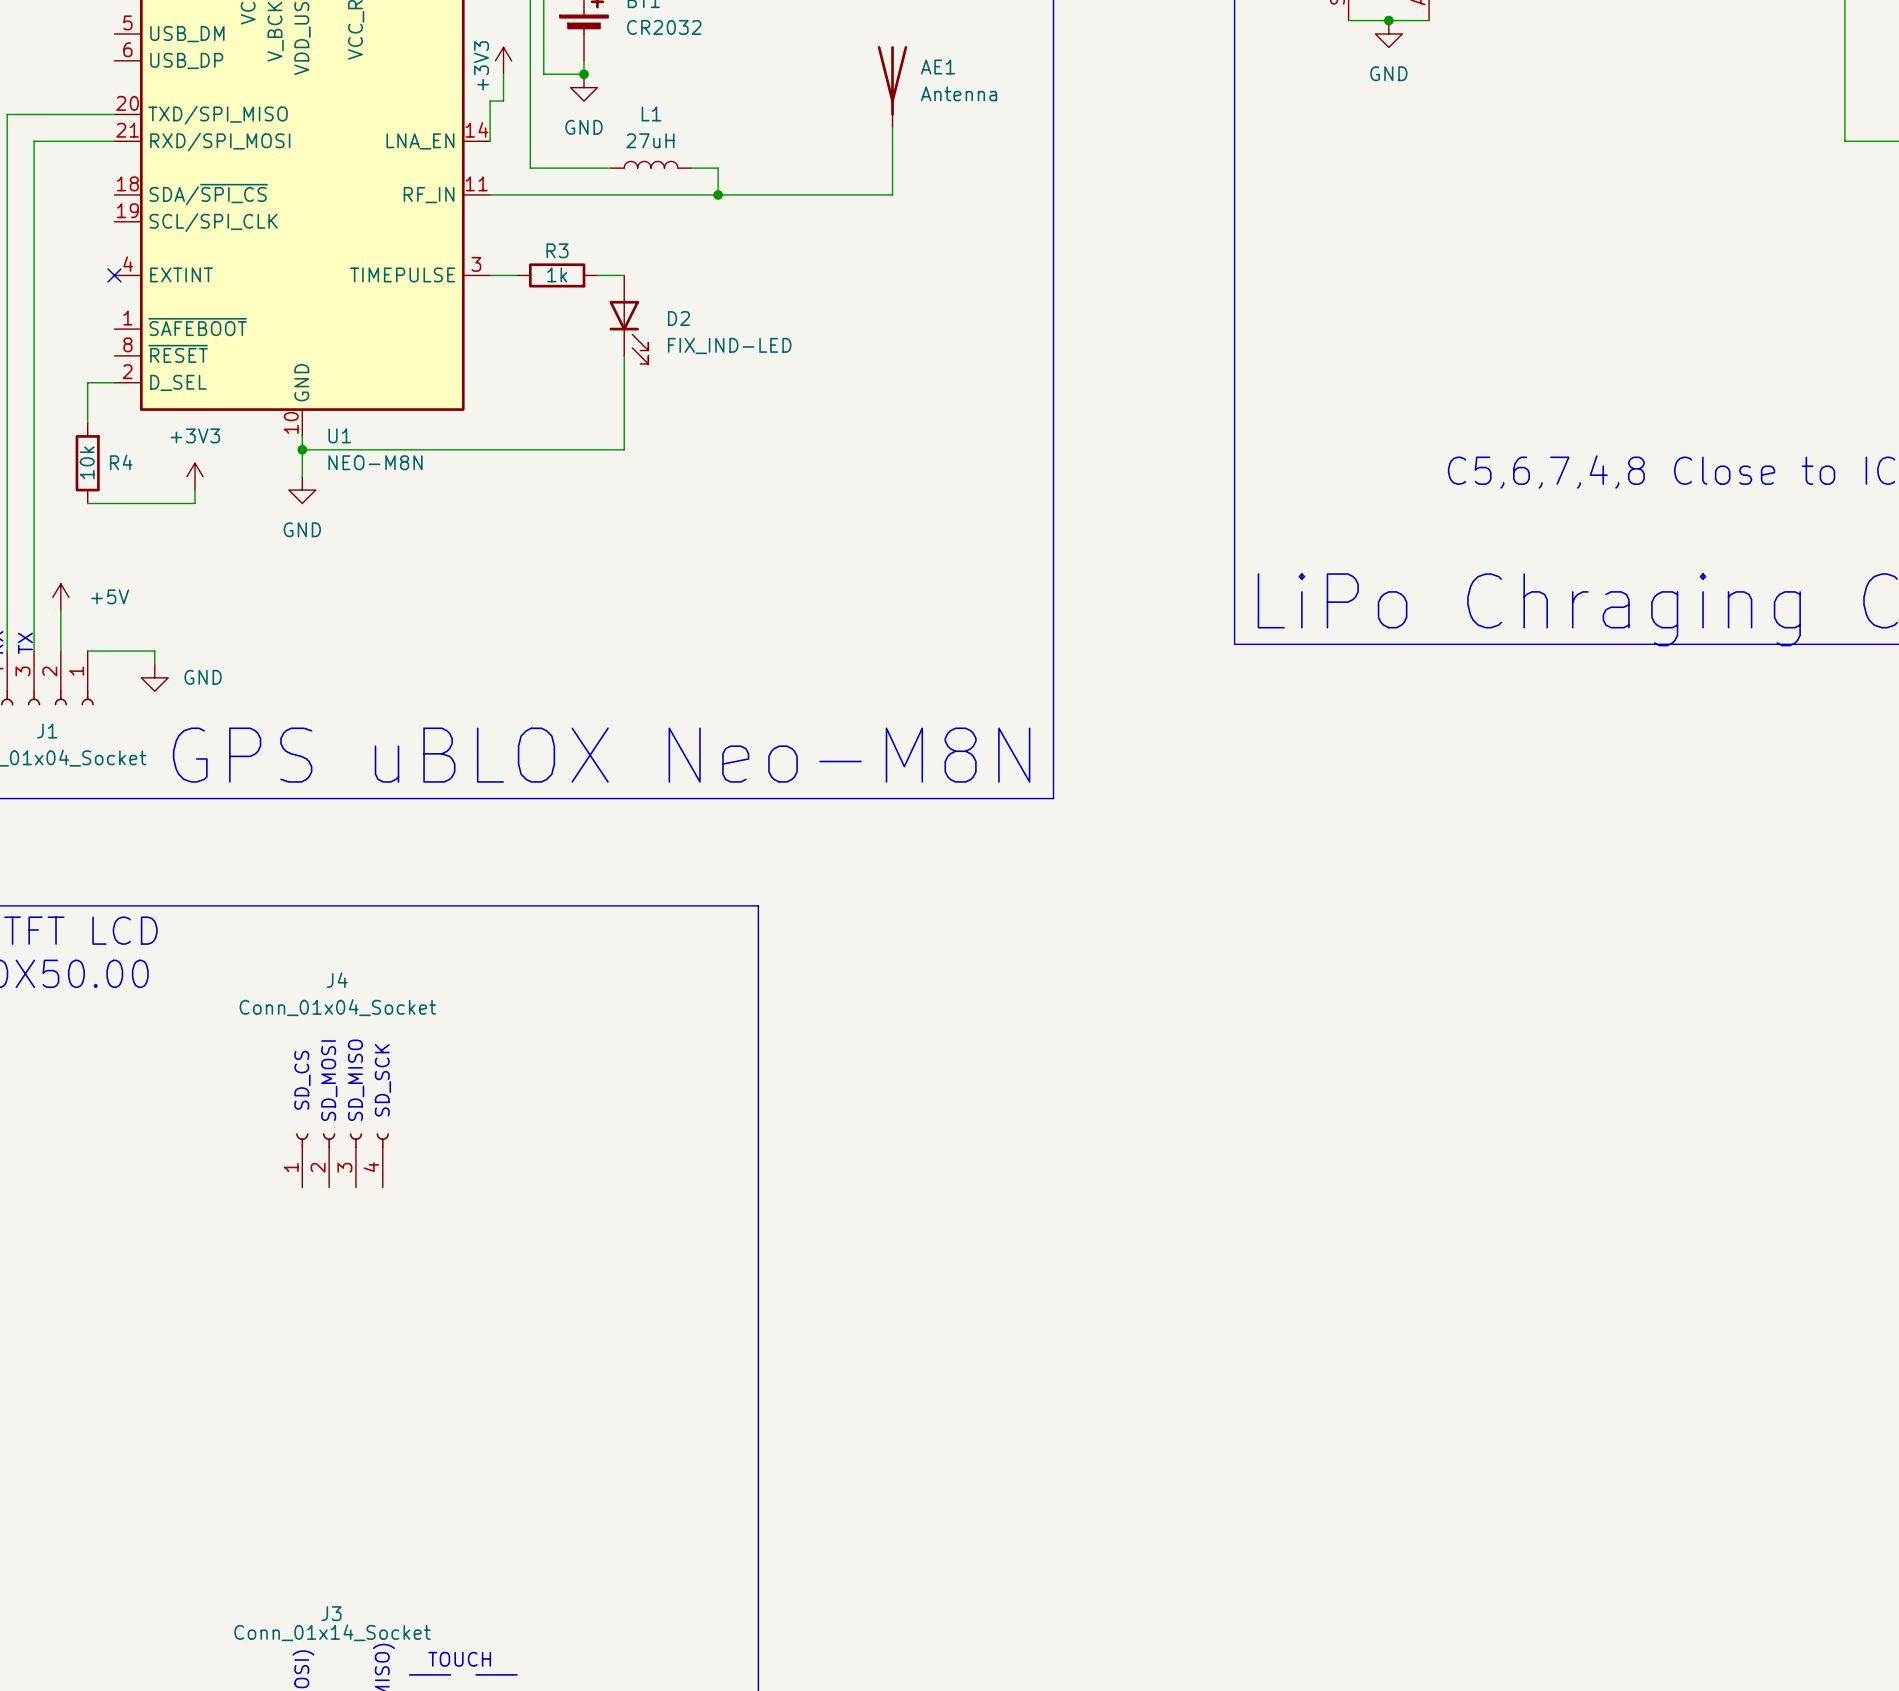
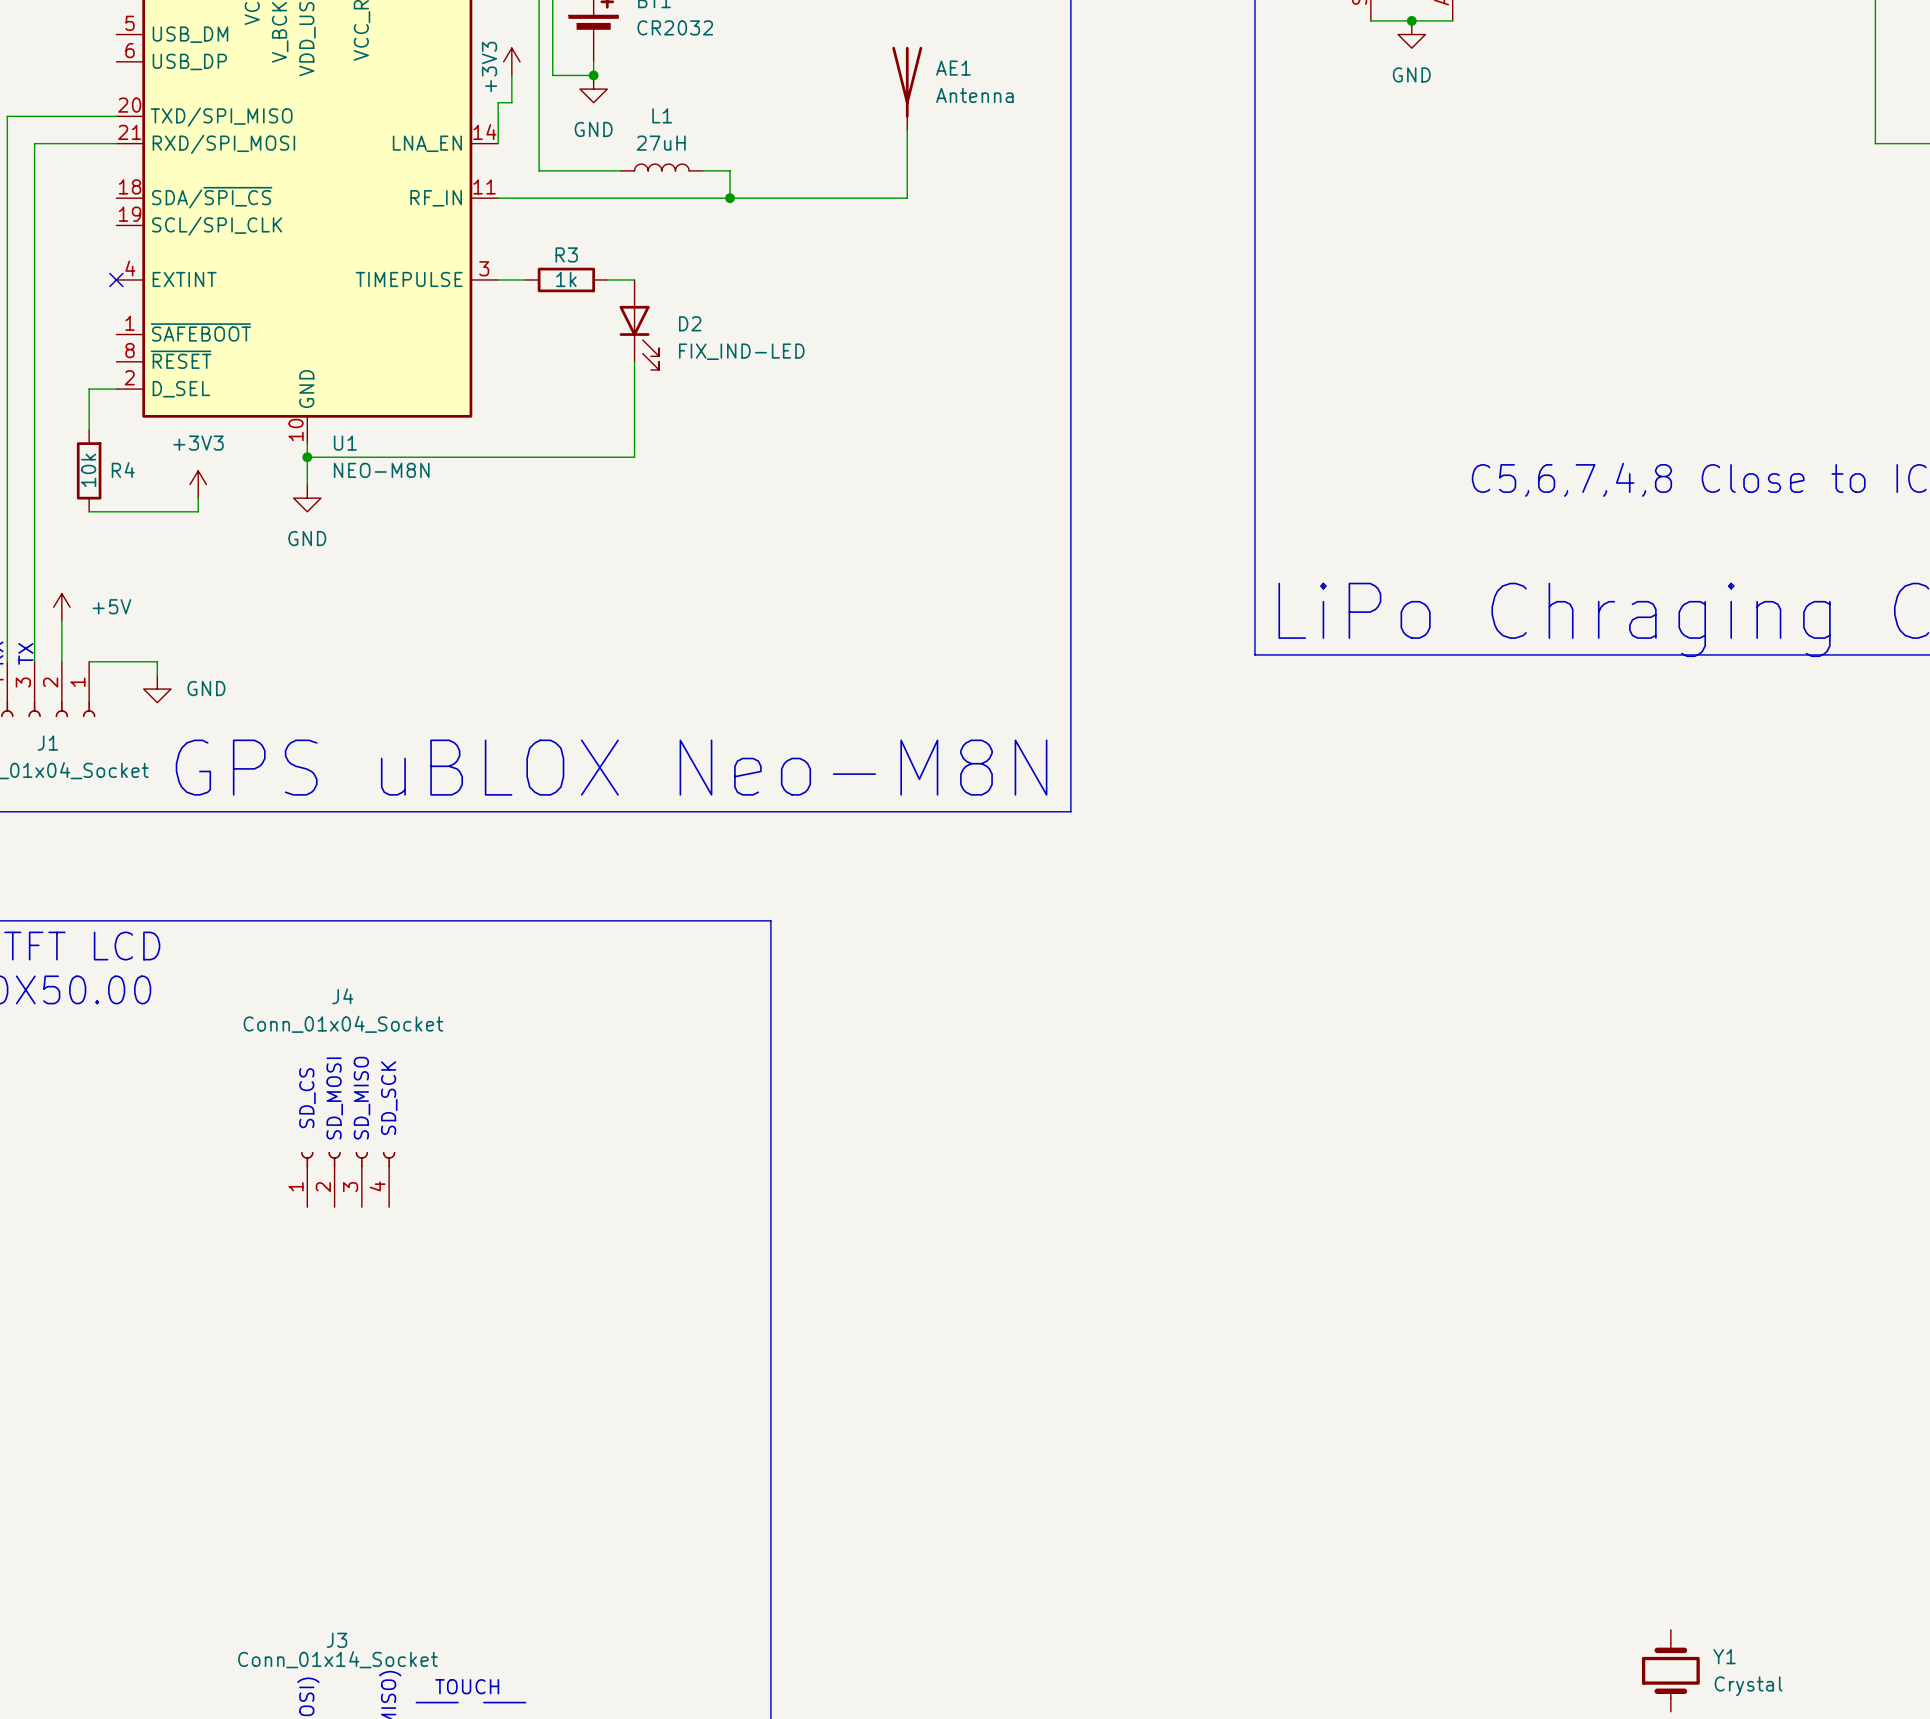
Y1: none -> Crystal (1670, 1670)

